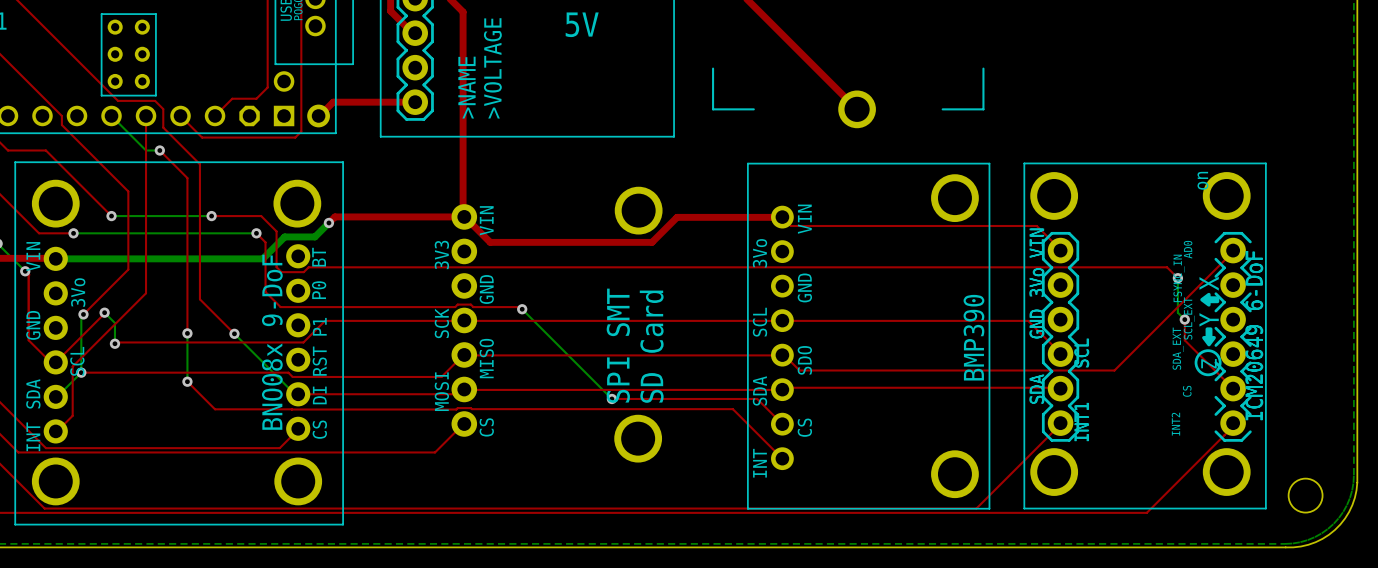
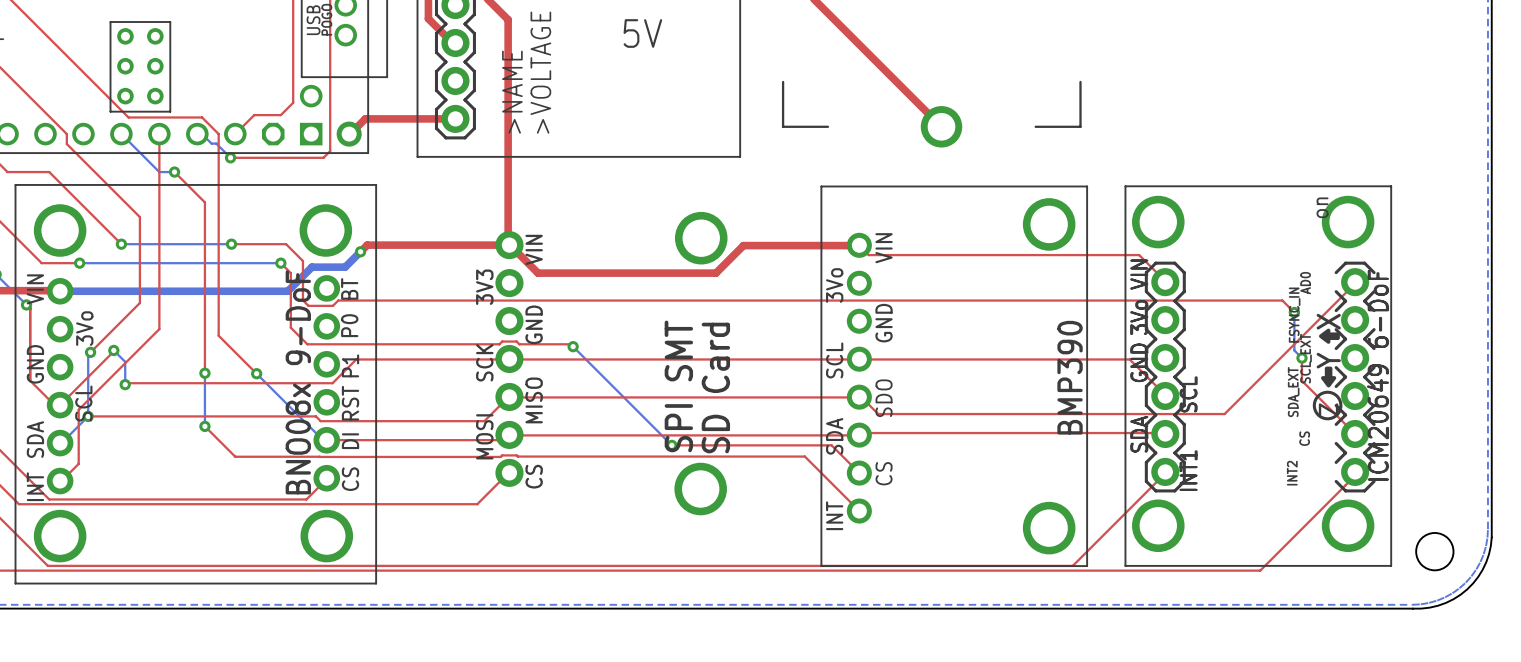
top track: (155, 100) (163, 109) (163, 127) (199, 164) -> (169, 117) (202, 117) (218, 134) (218, 187)
top track: (180, 115) (202, 137) (210, 137) -> none
bottom track: none -> (197, 134) (202, 134) (211, 143) (216, 143) (230, 157)
via: none -> (230, 157)

